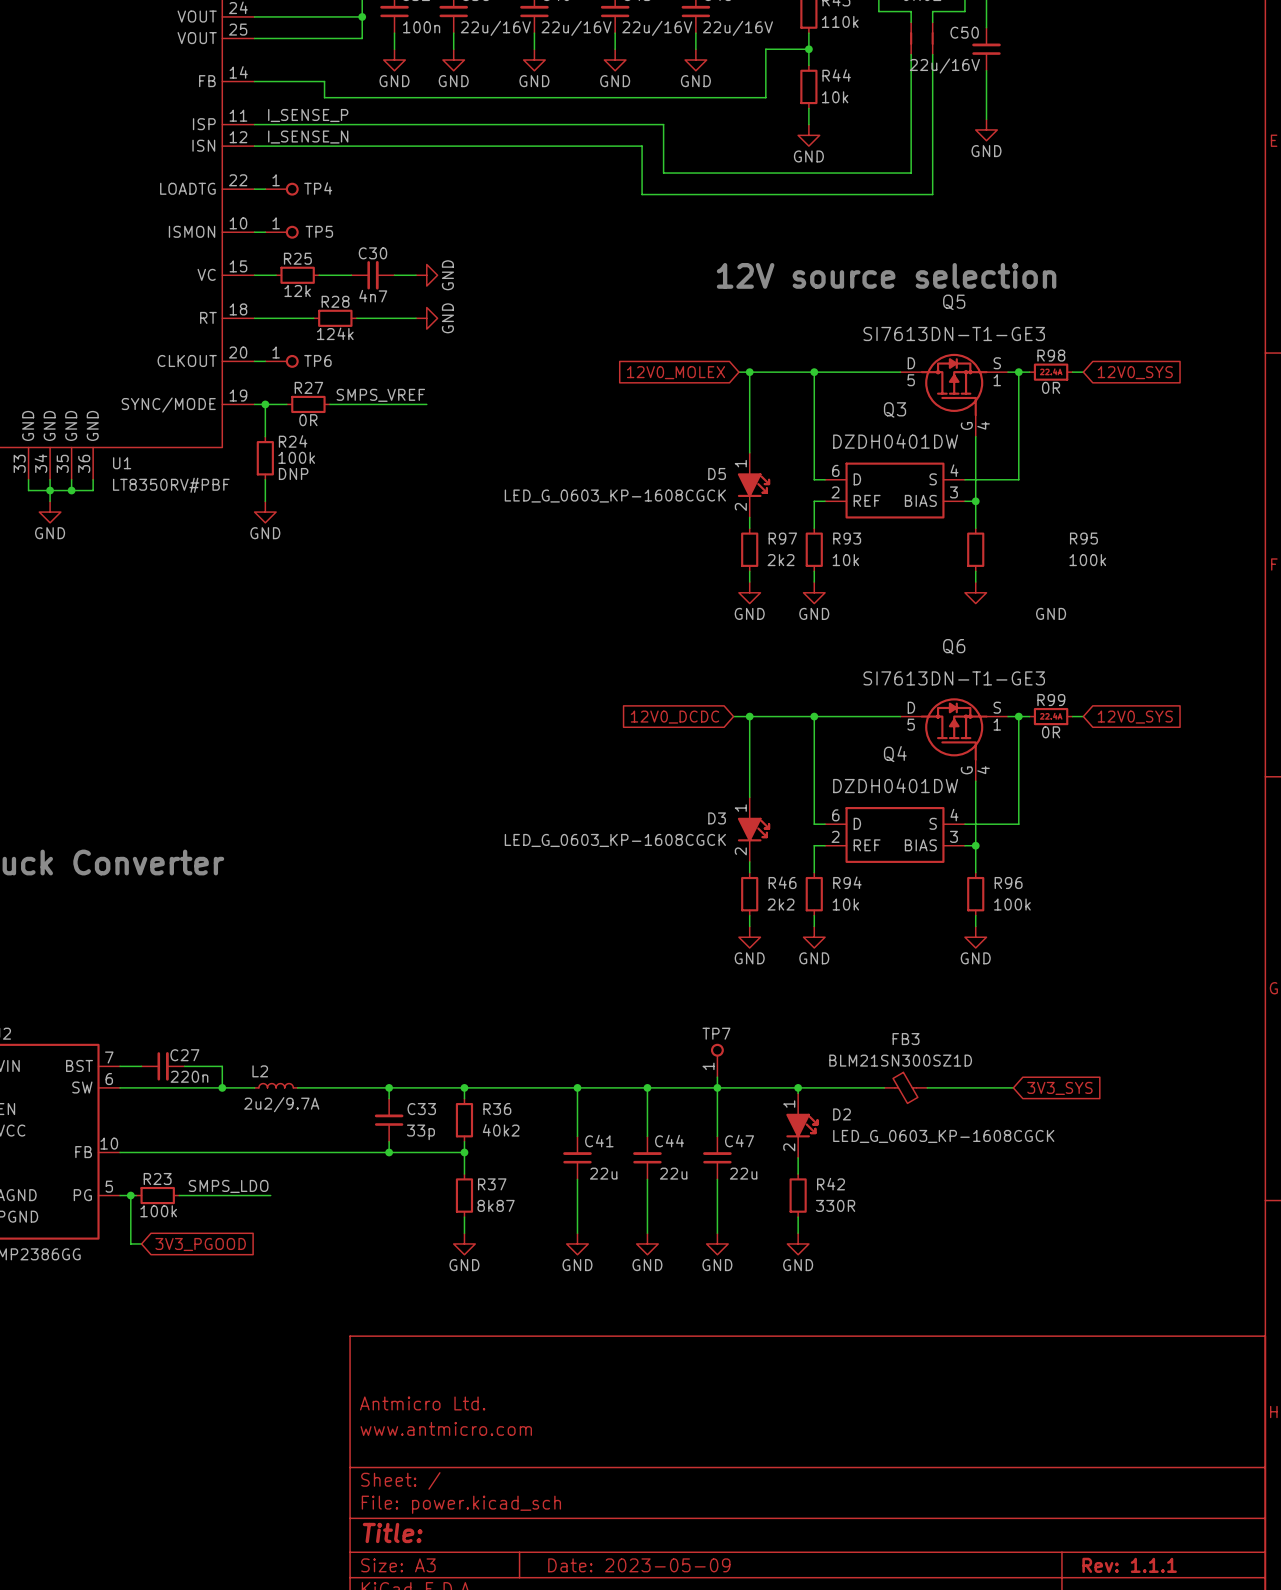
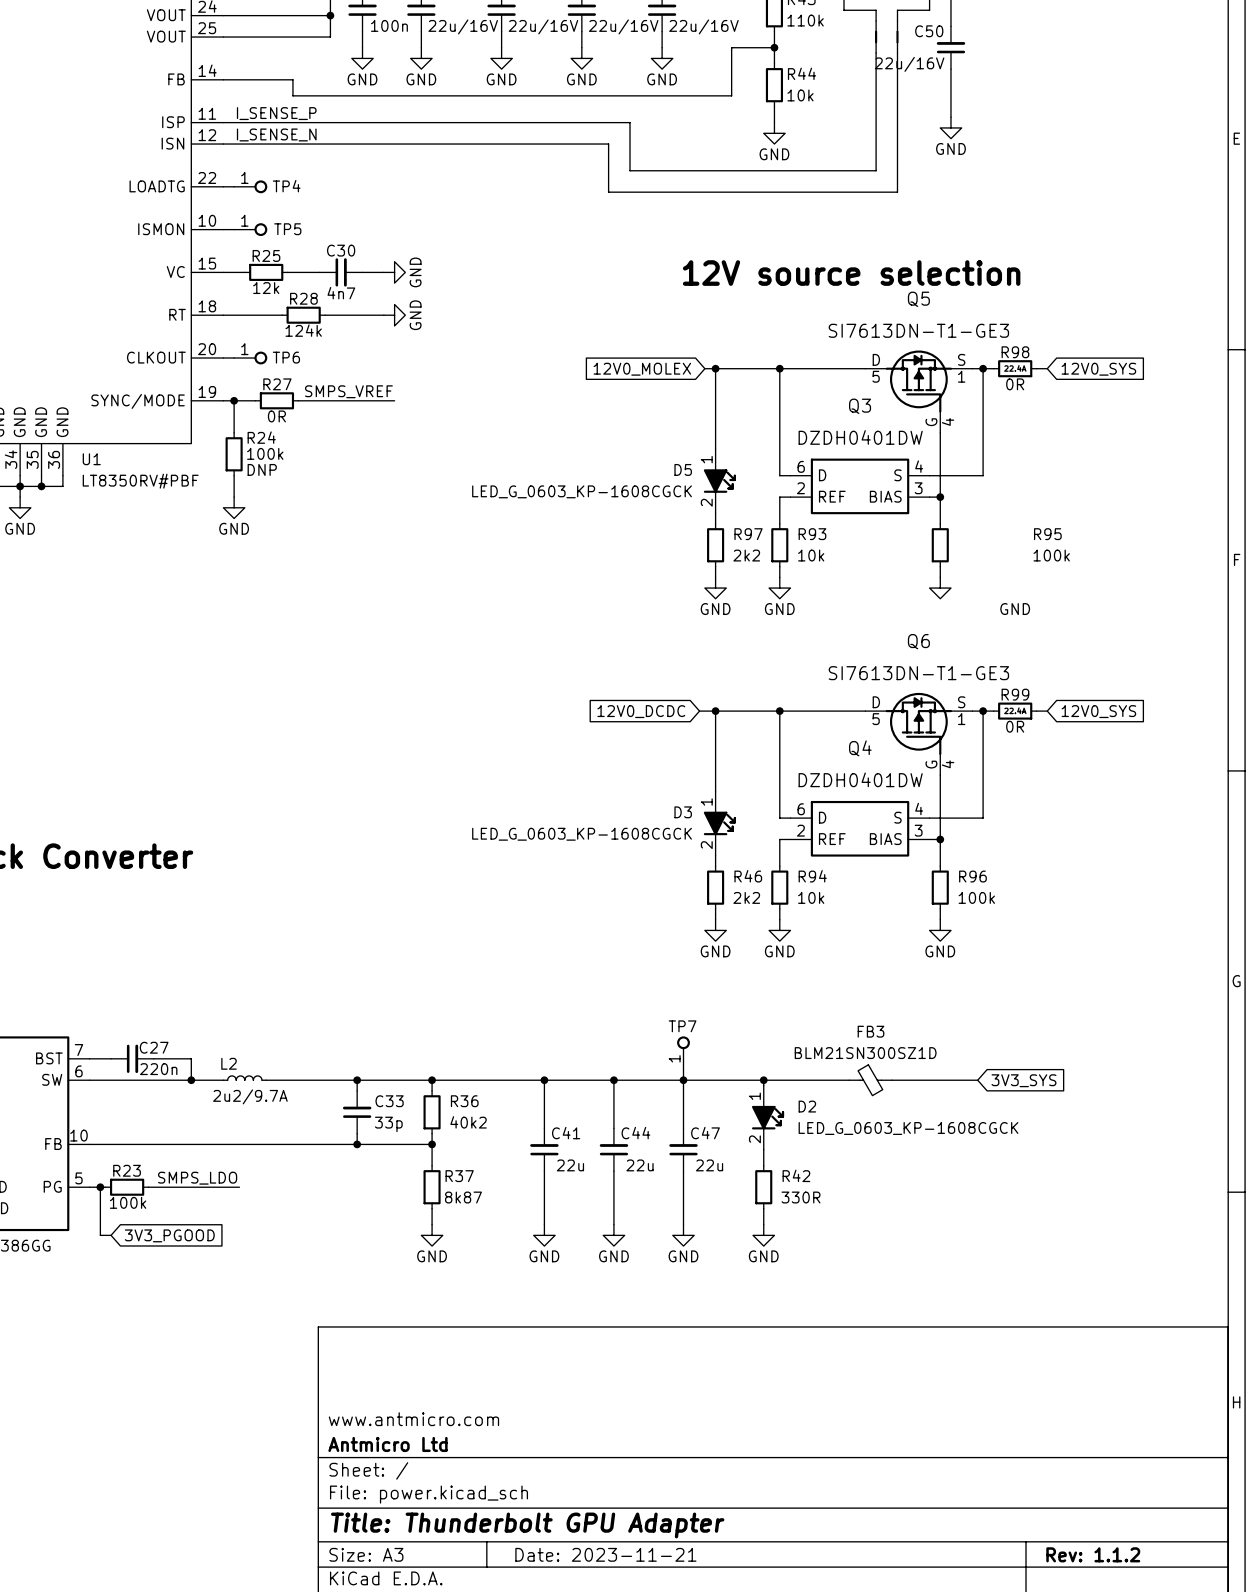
title block: Antmicro Ltd. (422, 1403) -> none
title block: none -> Antmicro Ltd (387, 1444)
title block: Title: (392, 1532) -> Title: Thunderbolt GPU Adapter (527, 1525)
title block: Date: 2023-05-09 (639, 1565) -> Date: 2023-11-21 (605, 1554)
title block: Rev: 1.1.1 (1129, 1565) -> Rev: 1.1.2 (1093, 1554)

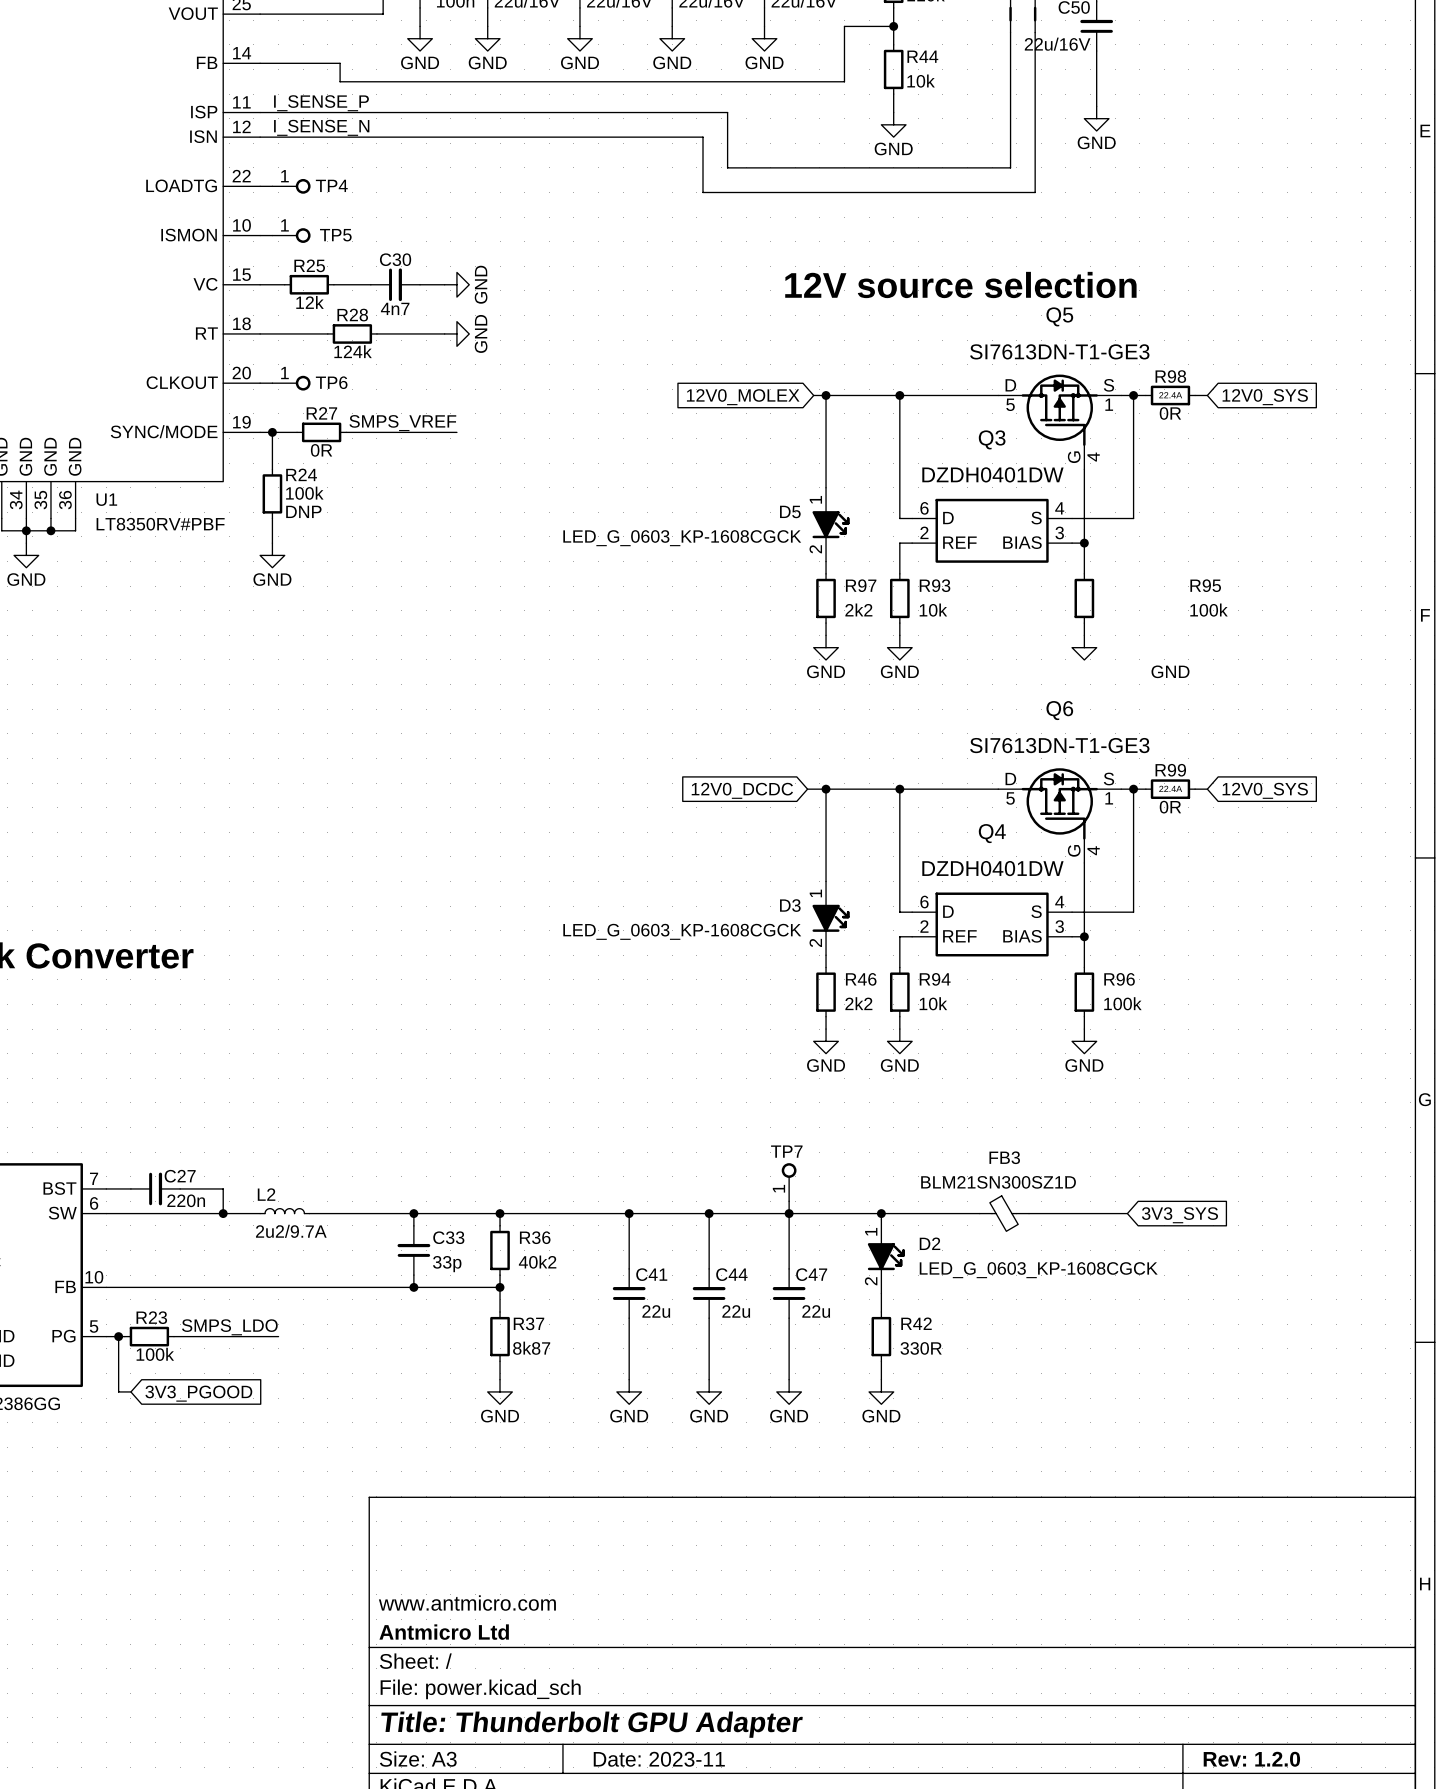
title block: Date: 2023-11-21 (605, 1554) -> Date: 2023-11 (659, 1759)
title block: Rev: 1.1.2 (1093, 1554) -> Rev: 1.2.0 (1251, 1759)

